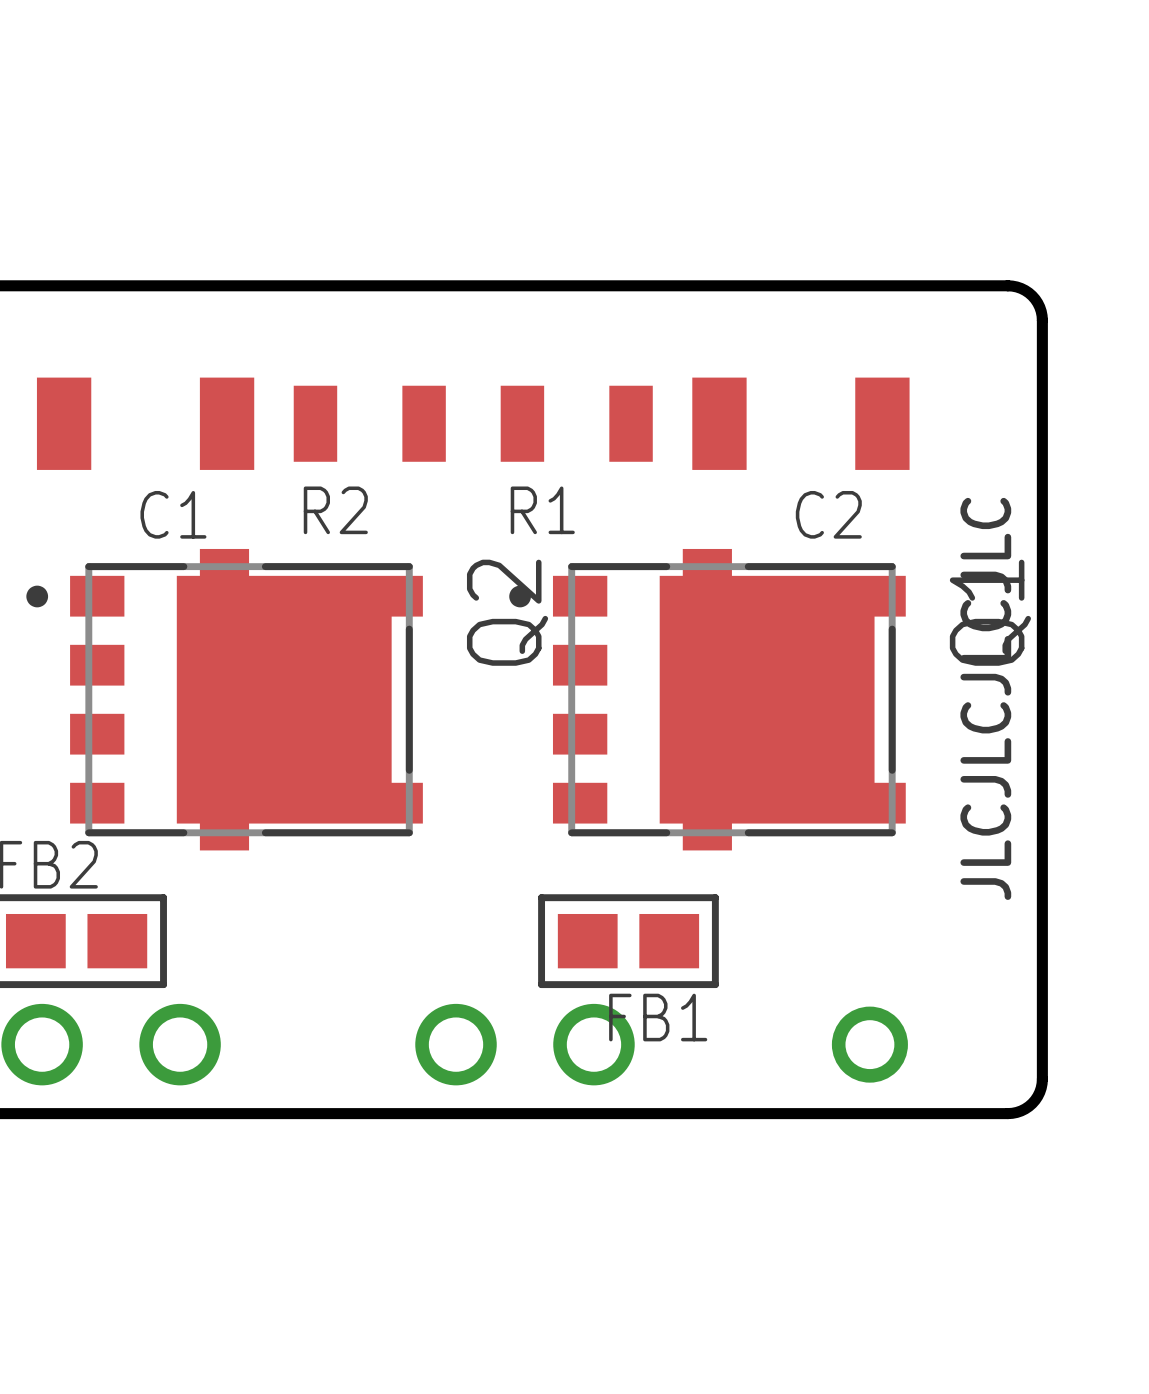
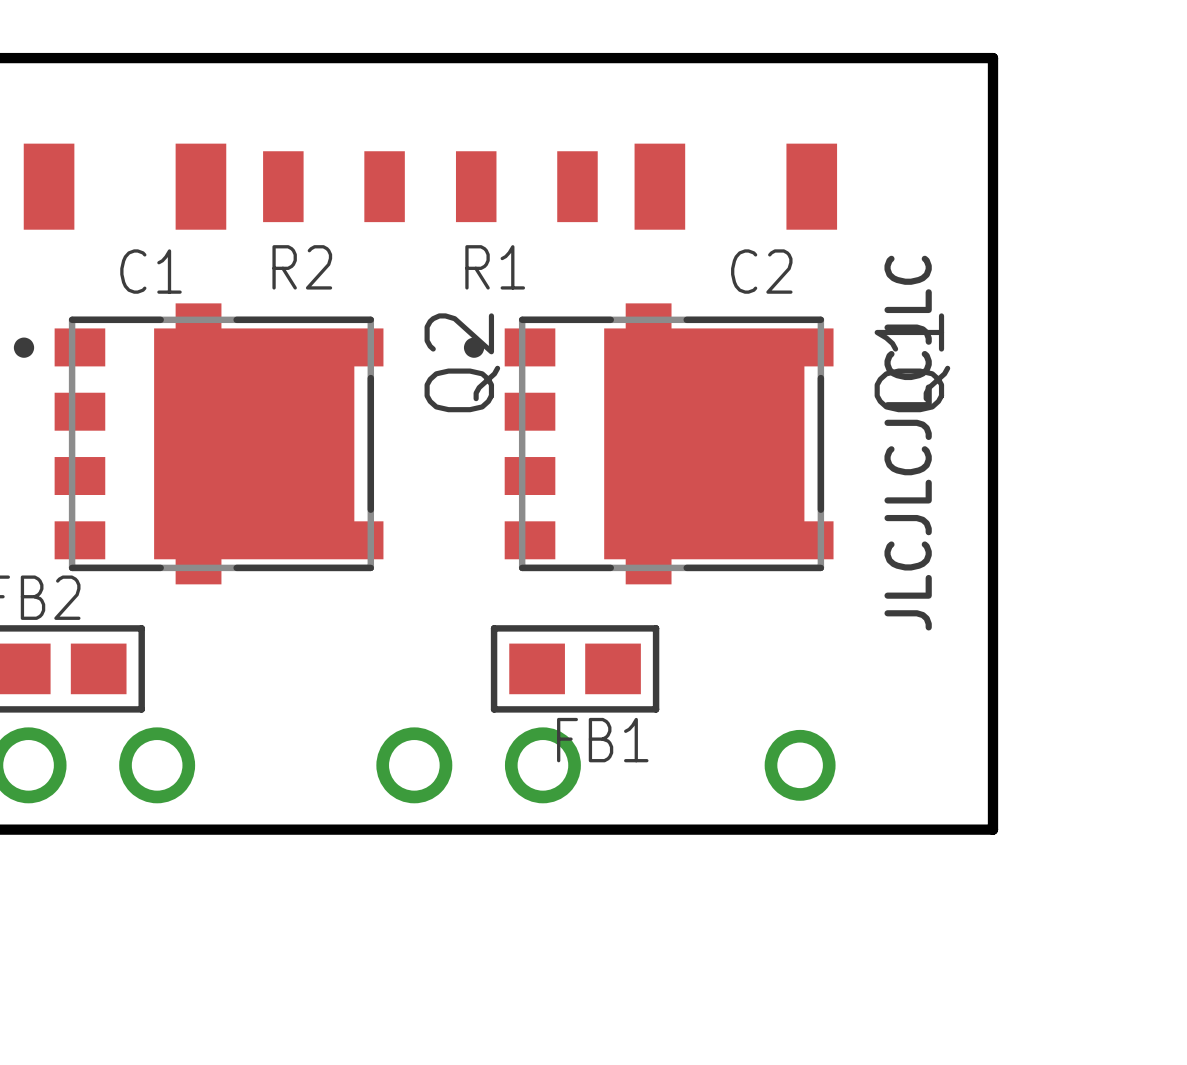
board edge: (1007, 285) (1021, 288) (1032, 295) (1039, 307) (1042, 320) (1042, 1079) (1039, 1092) (1032, 1103) (1021, 1110) (1007, 1113) -> (928, 58) (993, 58) (993, 829) (928, 829)

